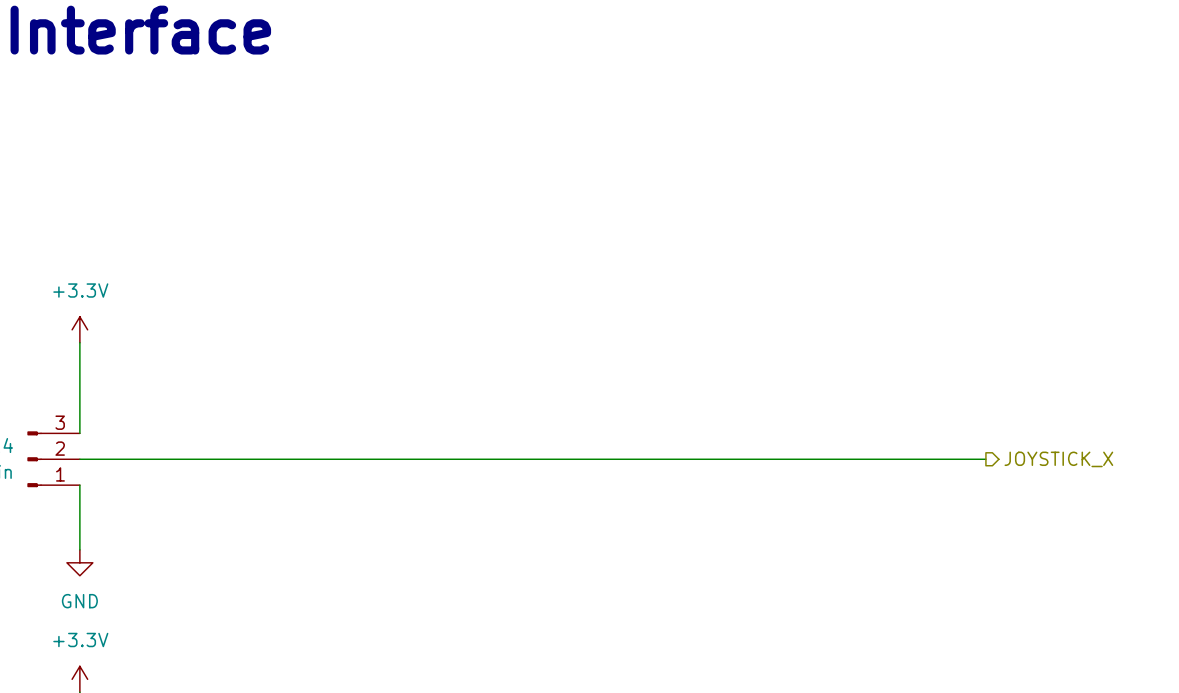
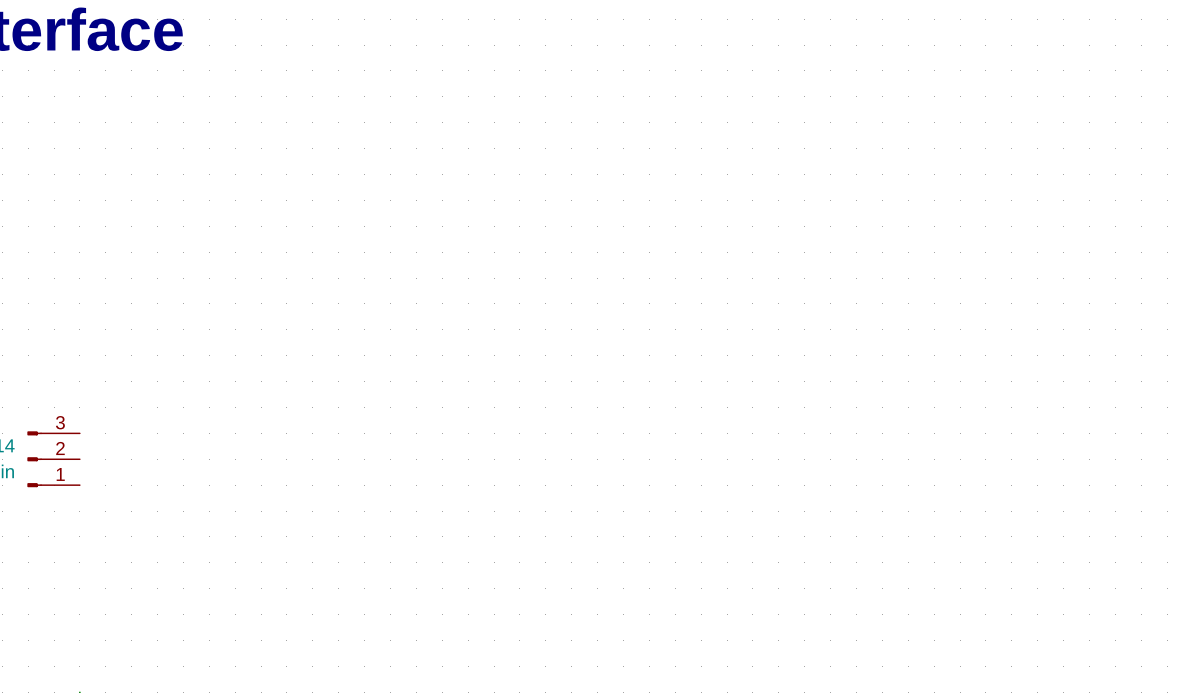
power symbol: +3.3V (79, 329) -> none
wire: (79, 342) (79, 433) -> none
wire: (79, 459) (985, 459) -> none
hierarchical label: JOYSTICK_X (1058, 459) -> none
wire: (79, 485) (79, 549) -> none
power symbol: GND (79, 562) -> none
power symbol: +3.3V (79, 679) -> none

